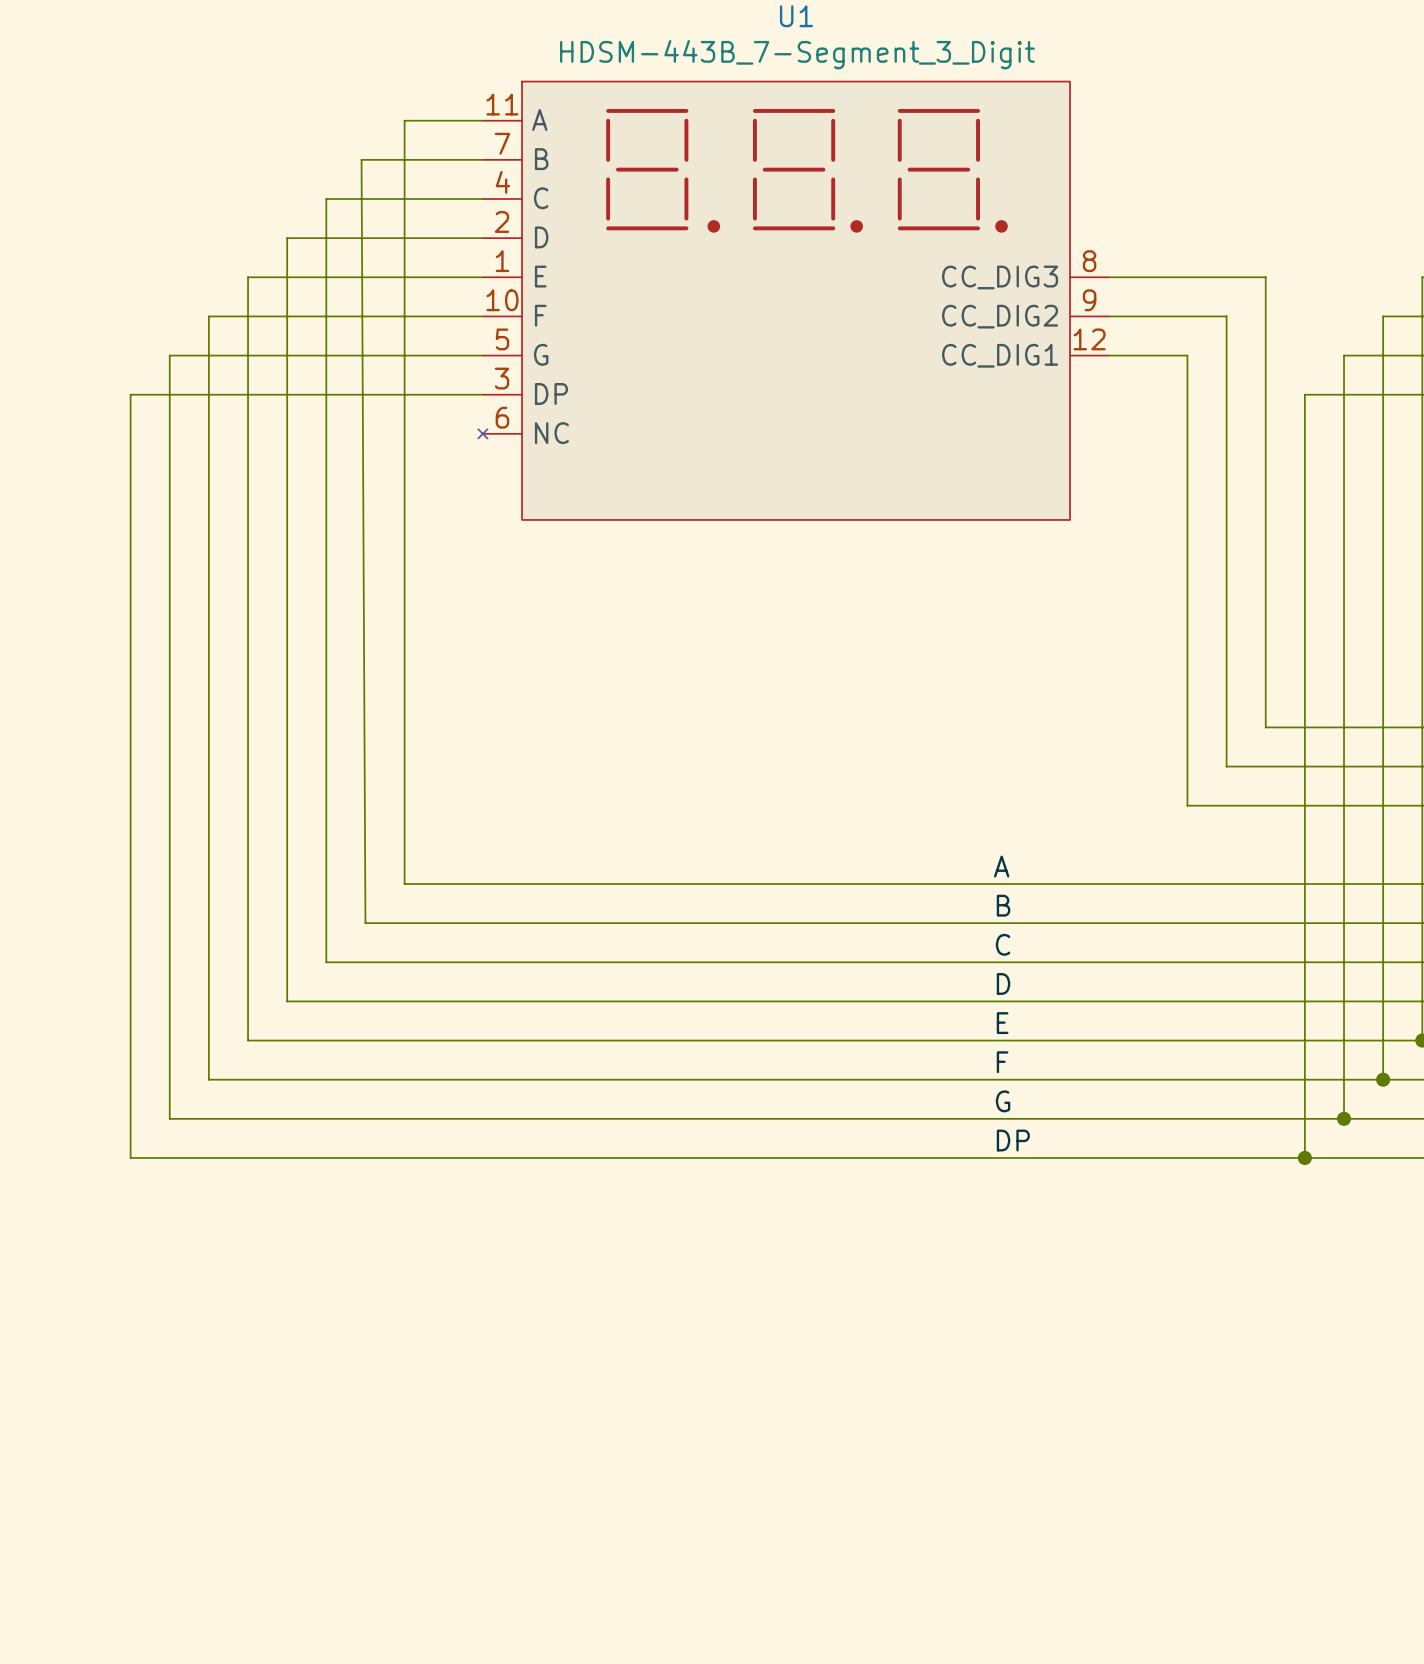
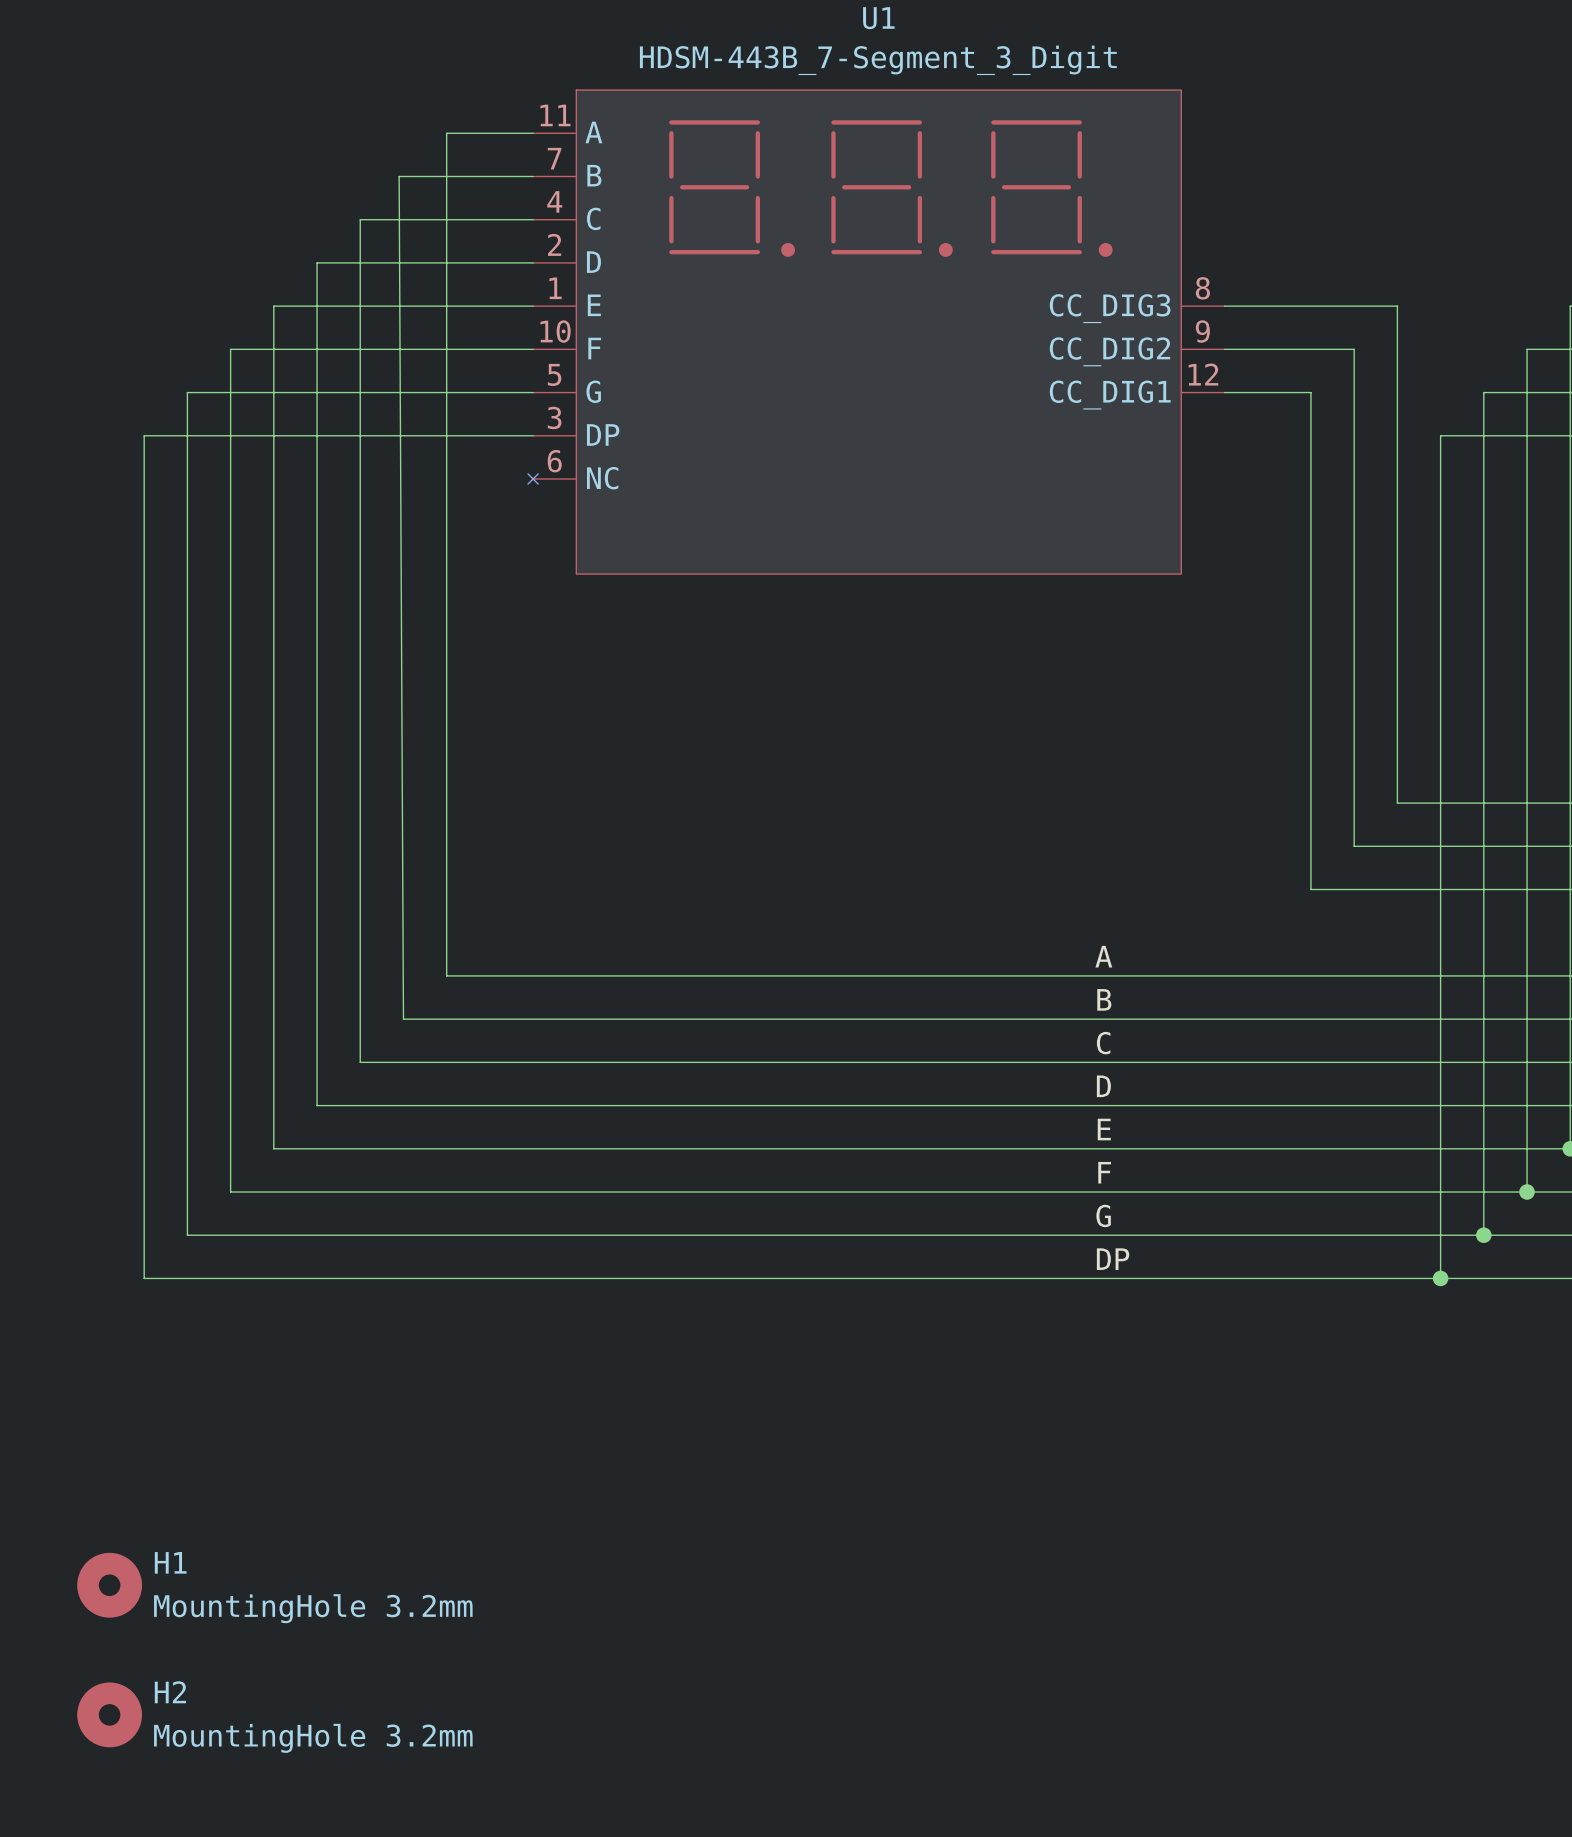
H1: none -> MountingHole 3.2mm (109, 1585)
H2: none -> MountingHole 3.2mm (109, 1714)

